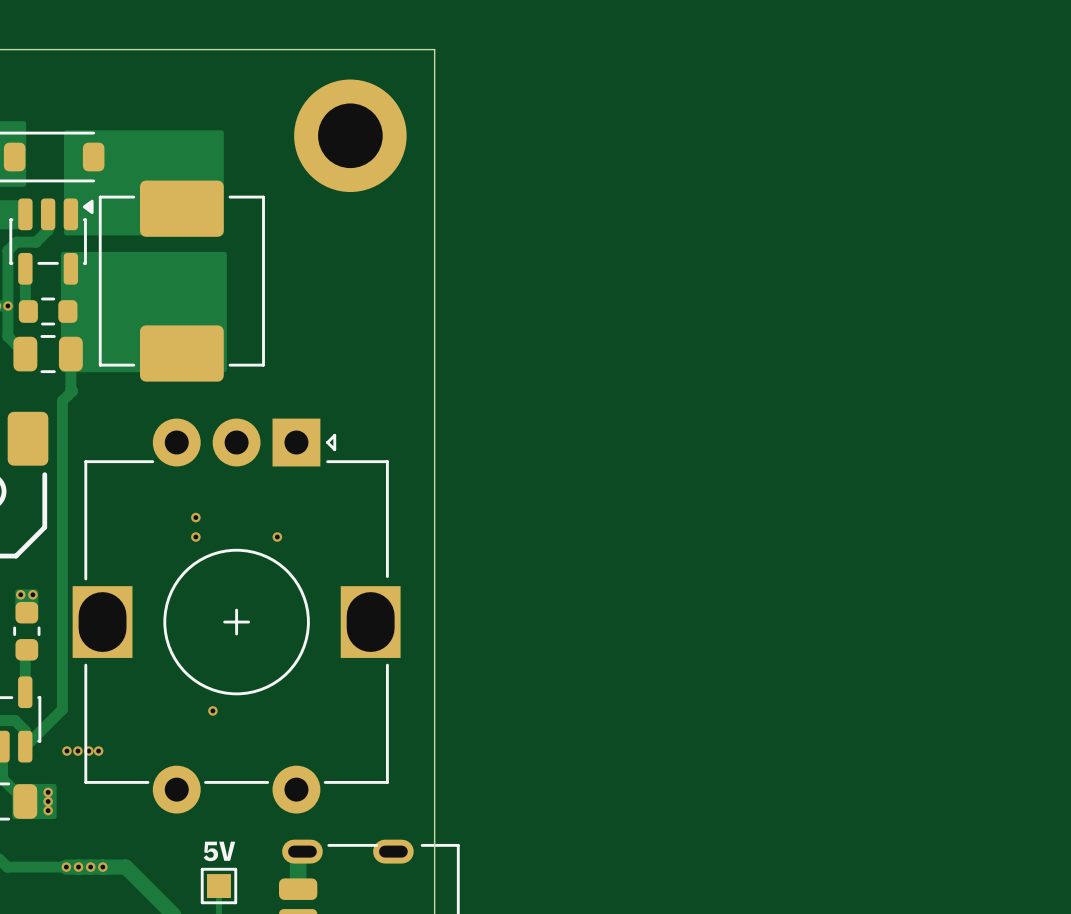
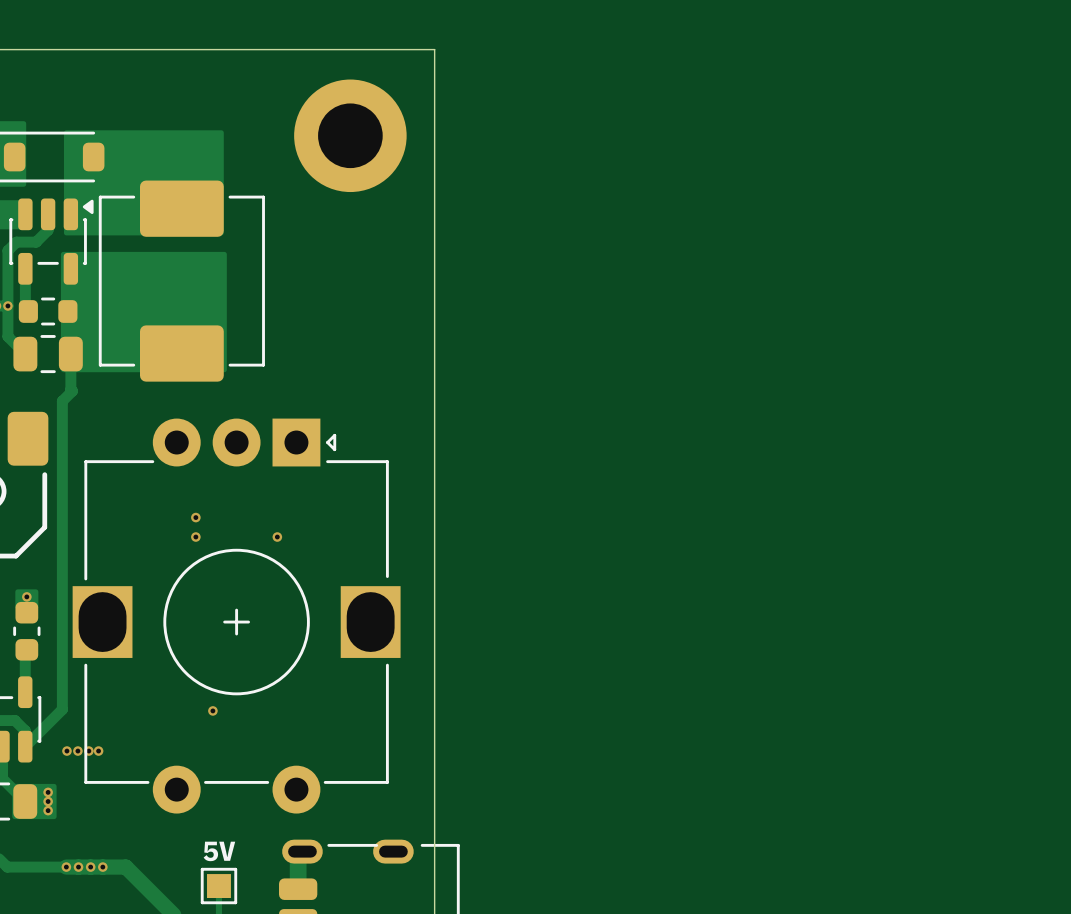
via: (20, 594) -> none
via: (32, 594) -> none
via: none -> (26, 596)

